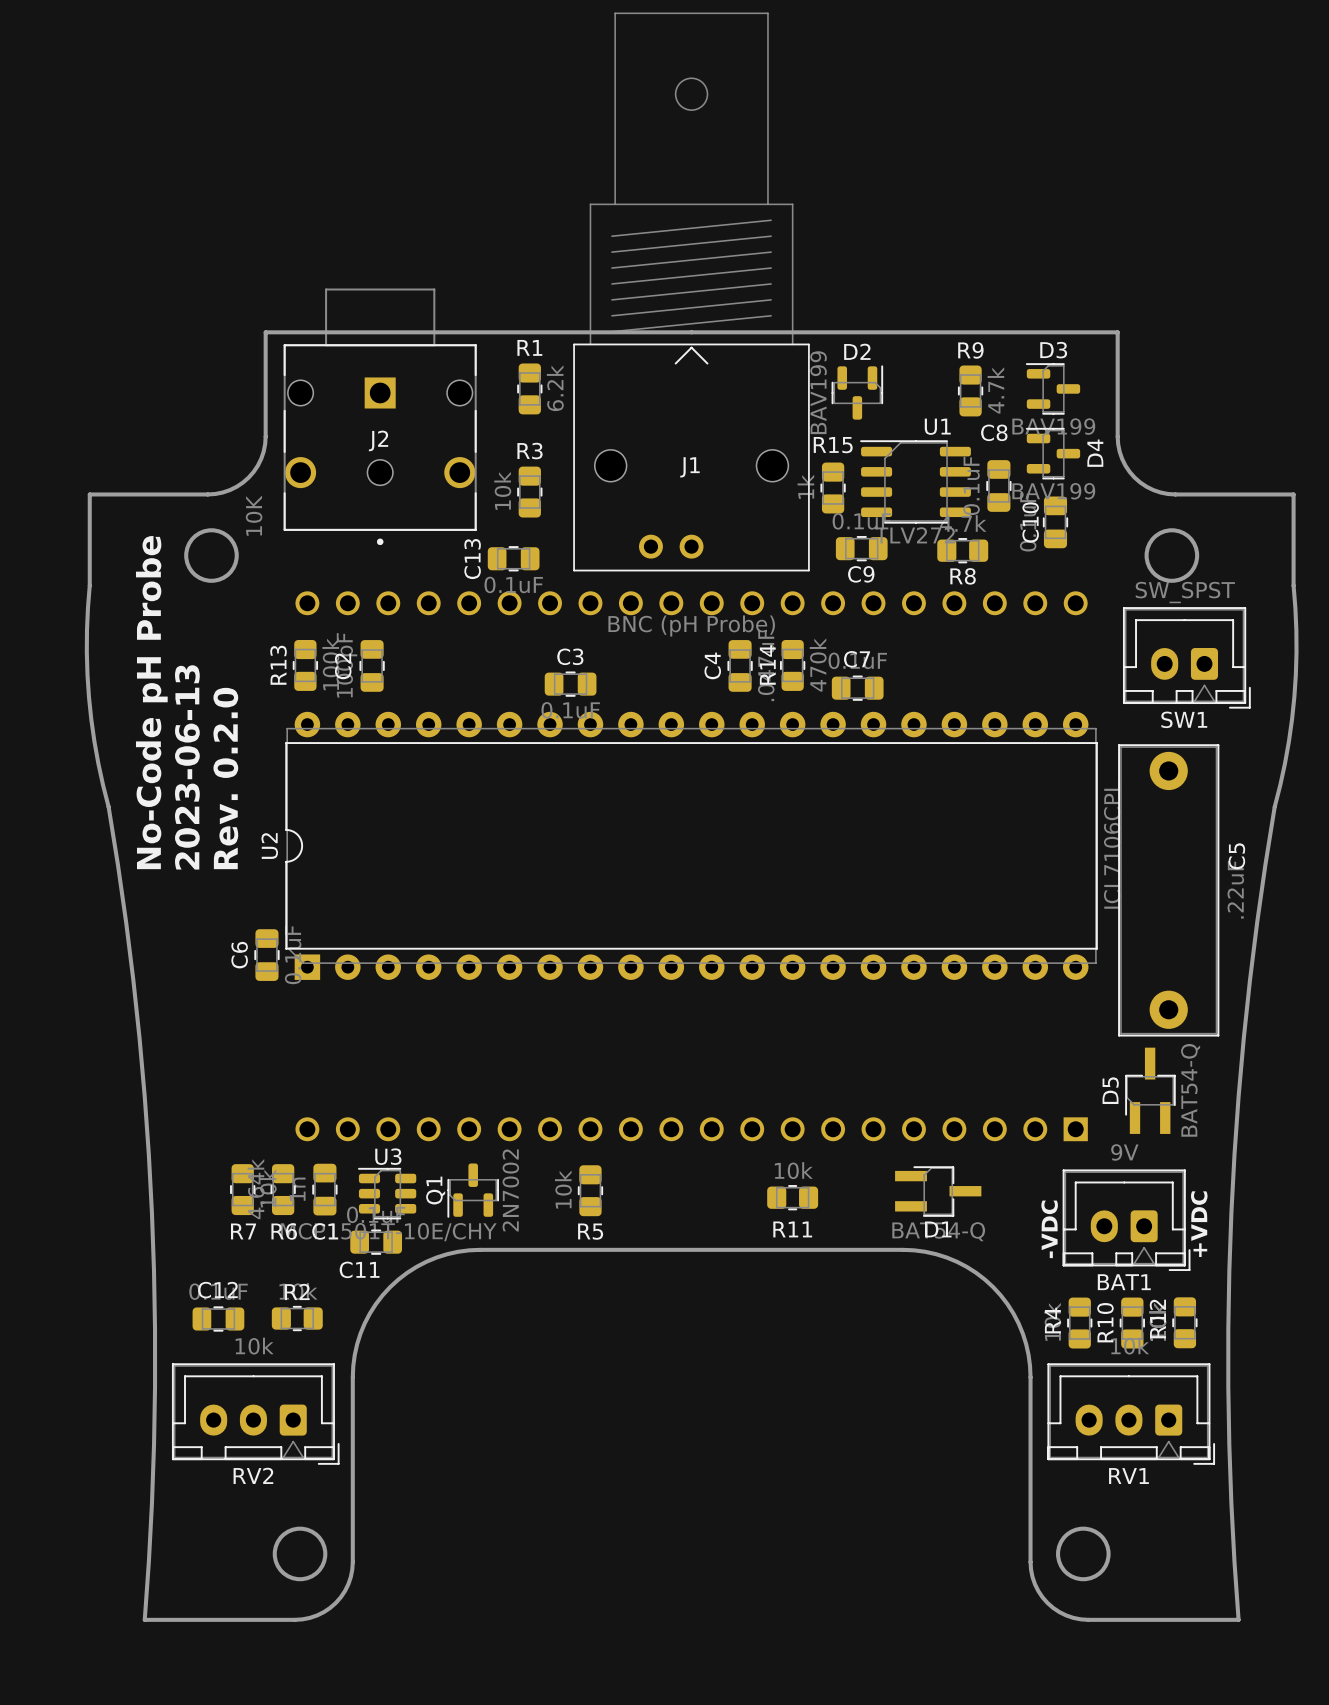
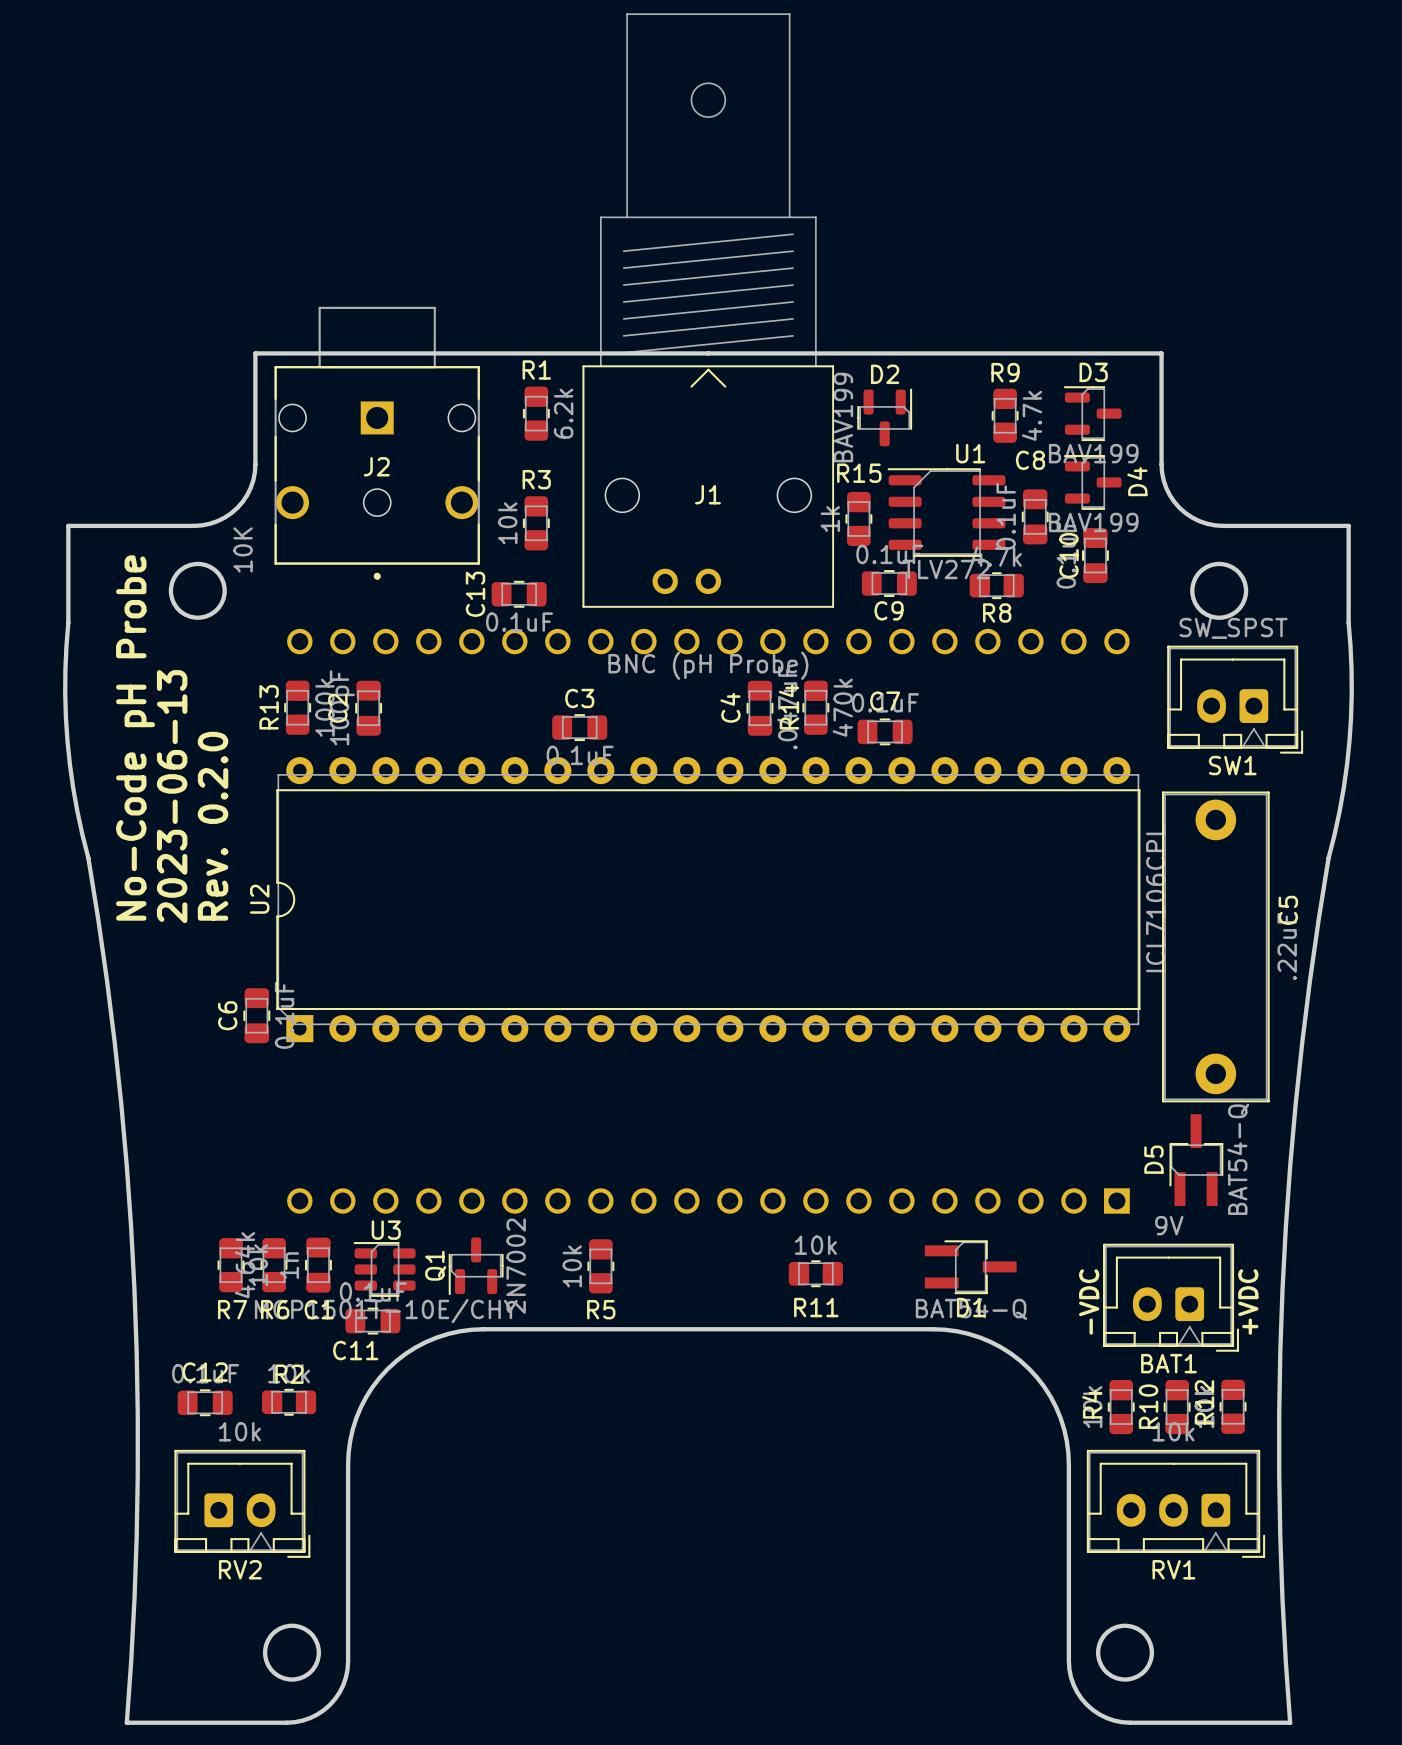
RV2 footprint: [171, 1363, 340, 1465] -> [174, 1449, 311, 1558]

